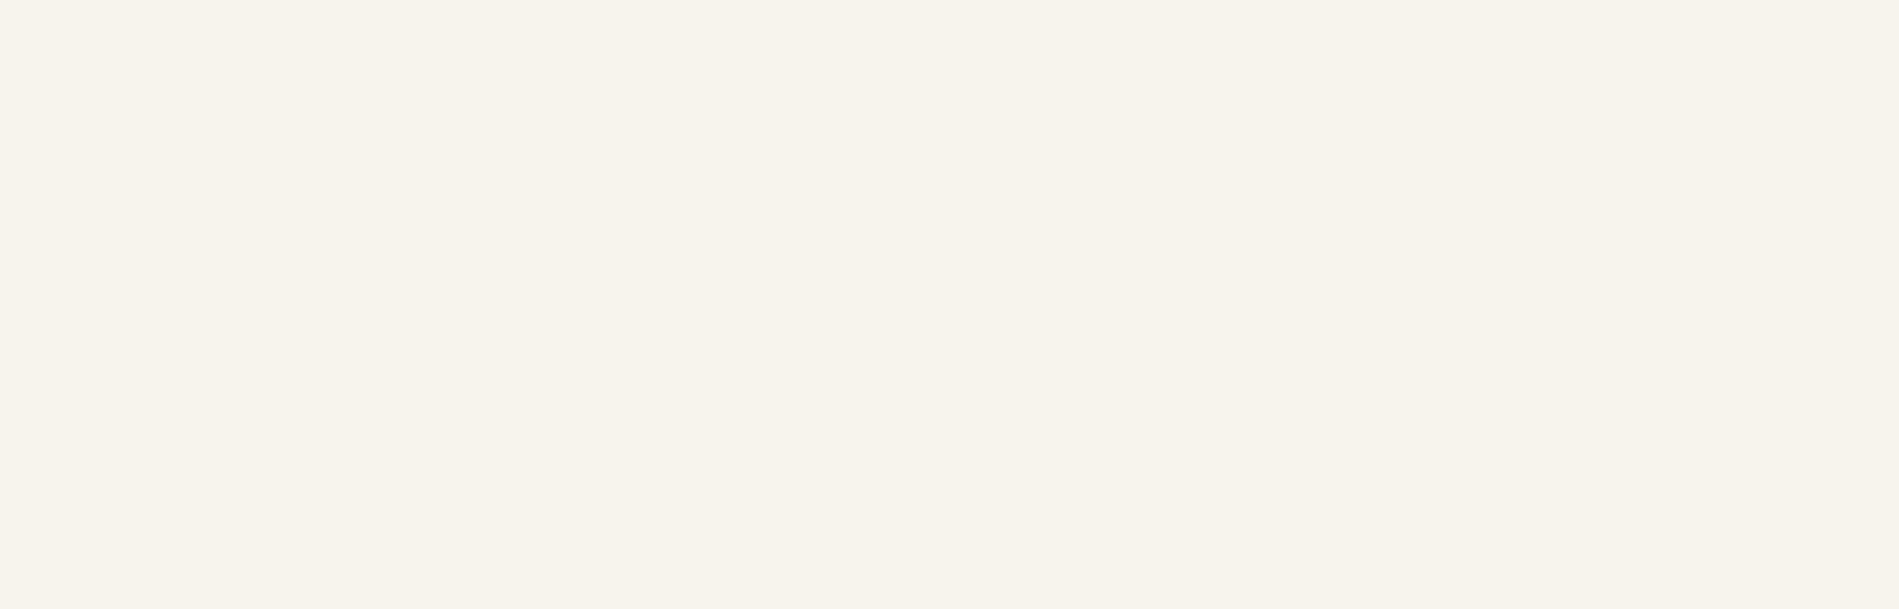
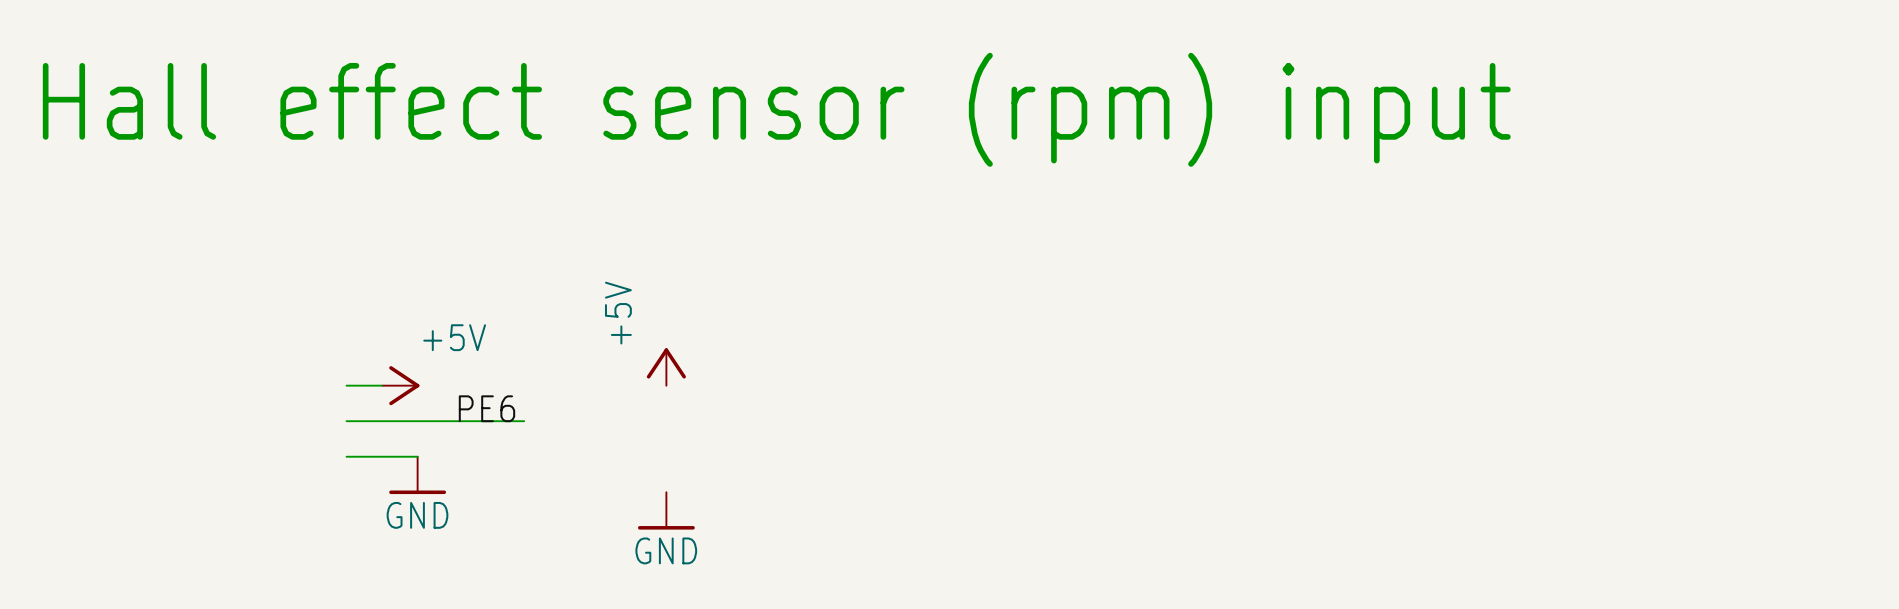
text: none -> Hall effect sensor (rpm) input (776, 109)
power symbol: none -> +5V (666, 367)
wire: none -> (346, 385) (382, 385)
power symbol: none -> +5V (400, 385)
label: none -> PE6 (486, 408)
wire: none -> (346, 421) (524, 421)
wire: none -> (346, 456) (417, 456)
power symbol: none -> GND (417, 475)
power symbol: none -> GND (666, 510)

